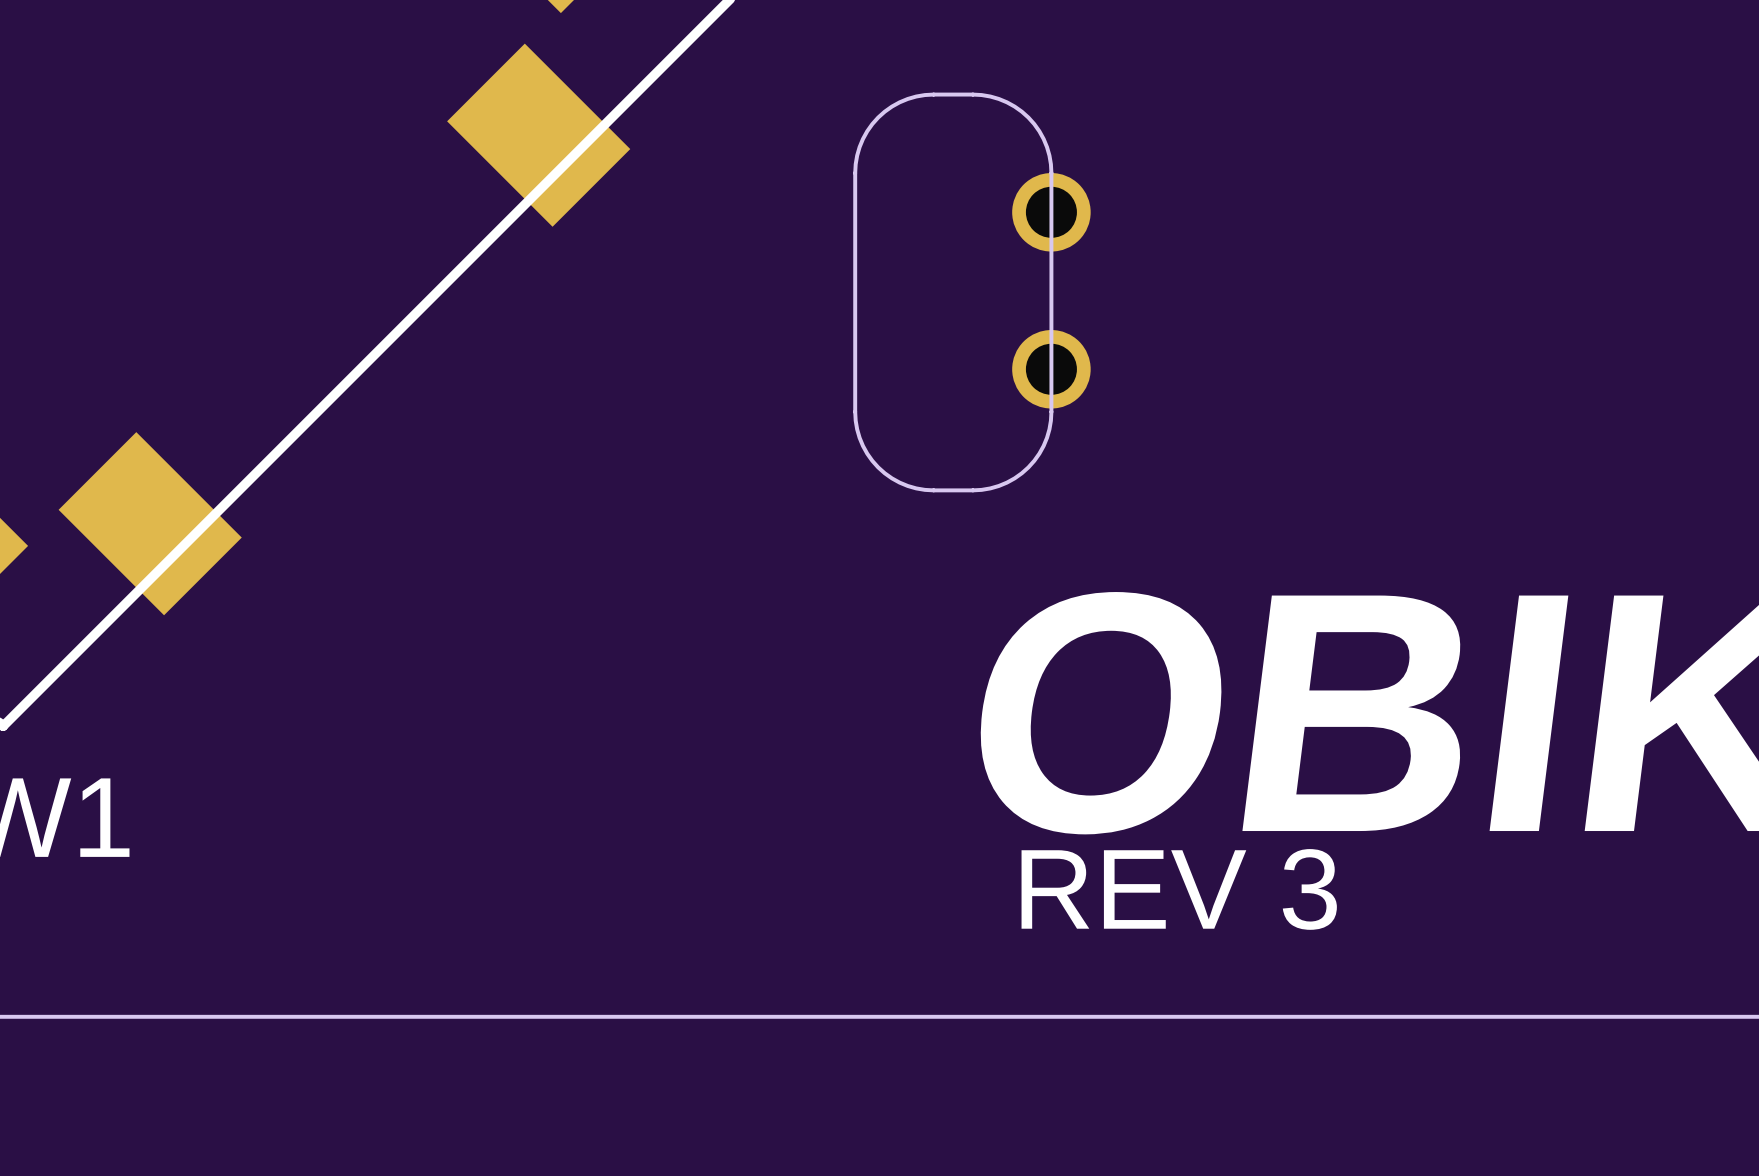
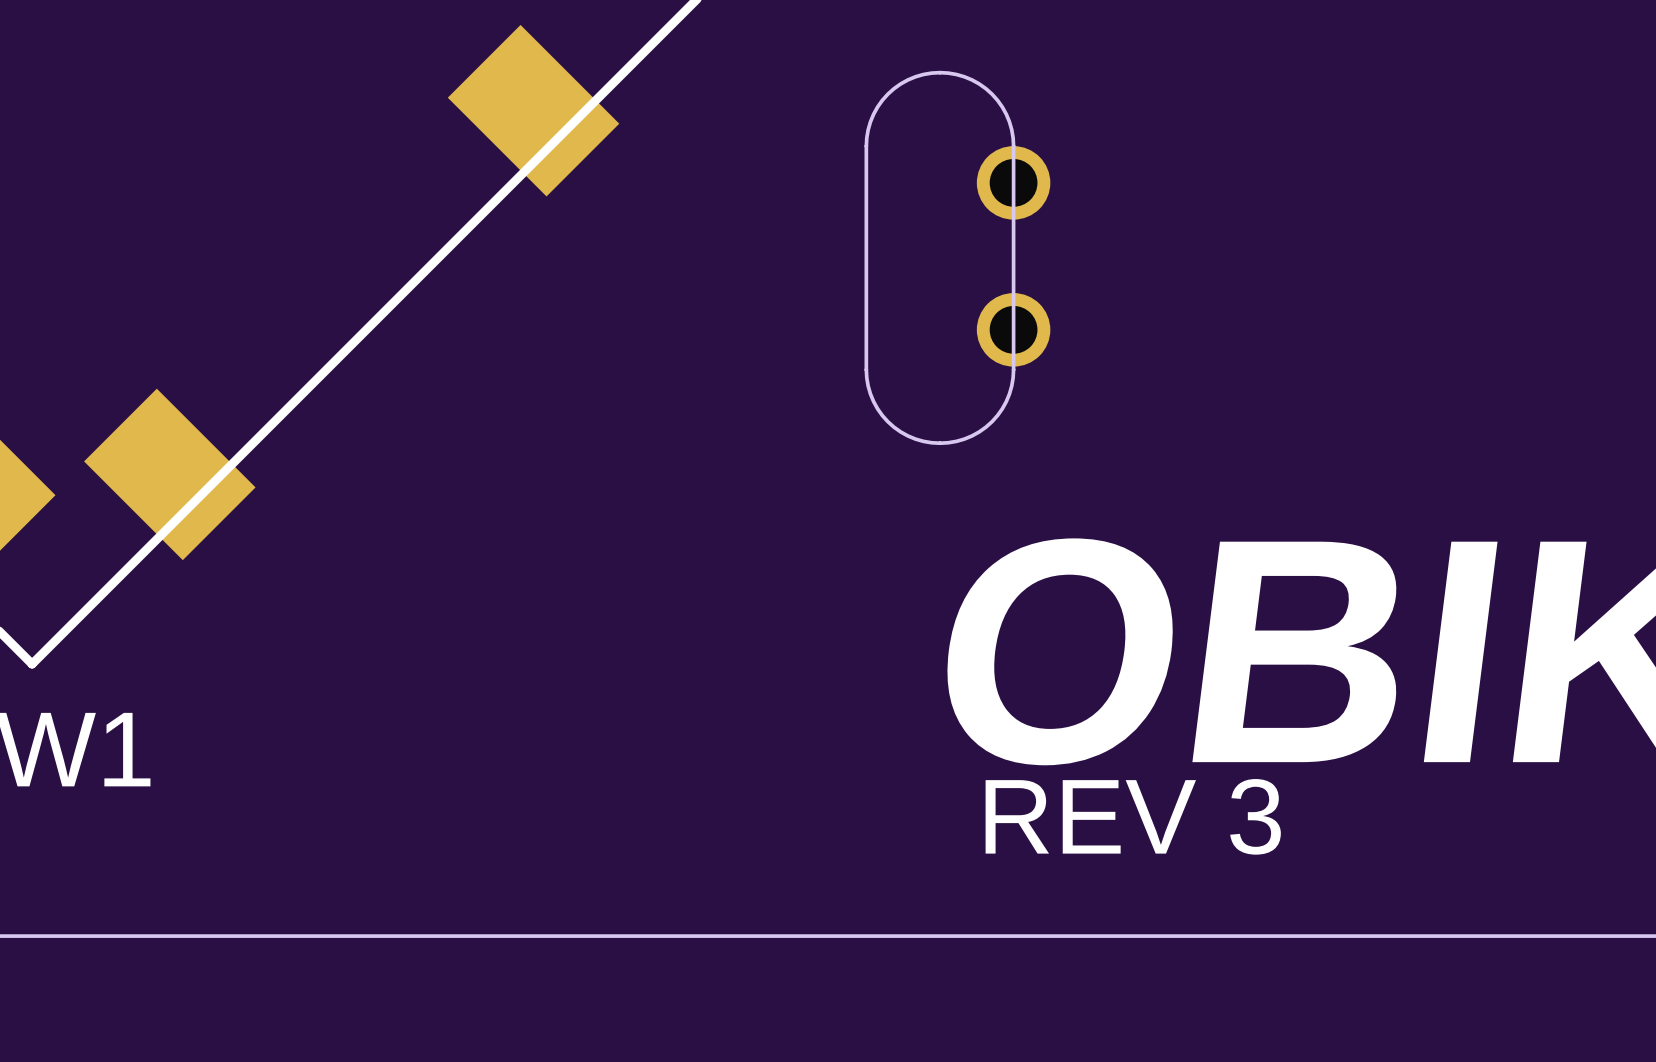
board edge: (972, 94) (924, 95) (907, 98) (891, 106) (878, 117) (867, 131) (859, 147) (855, 173) (855, 411) (859, 437) (872, 460) (884, 473) (899, 482) (924, 489) (972, 490) -> (939, 72) (923, 74) (907, 79) (887, 94) (873, 114) (868, 129) (866, 146) (866, 369) (868, 386) (877, 408) (894, 427) (915, 439) (939, 443)

